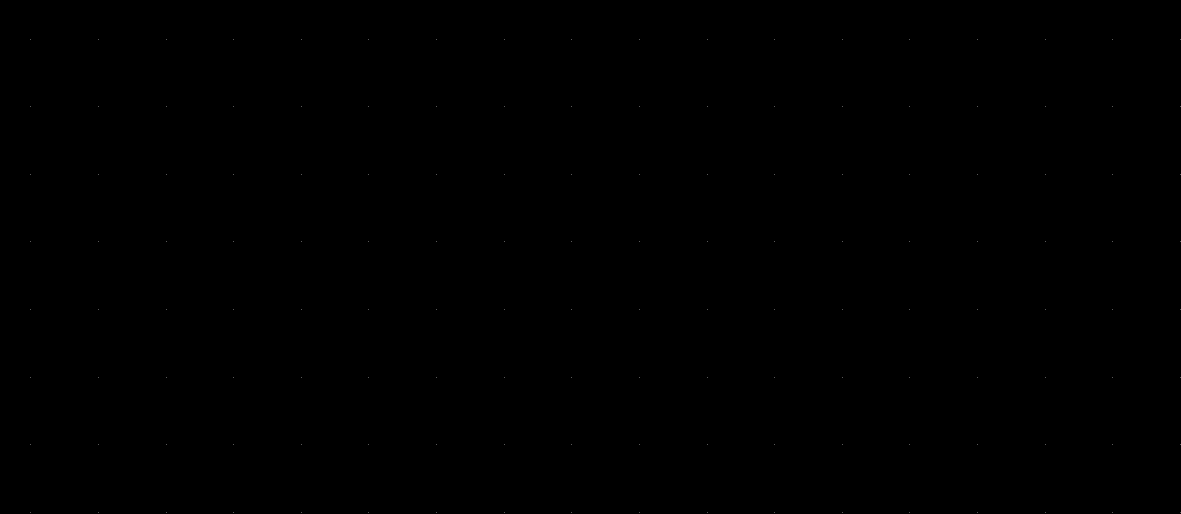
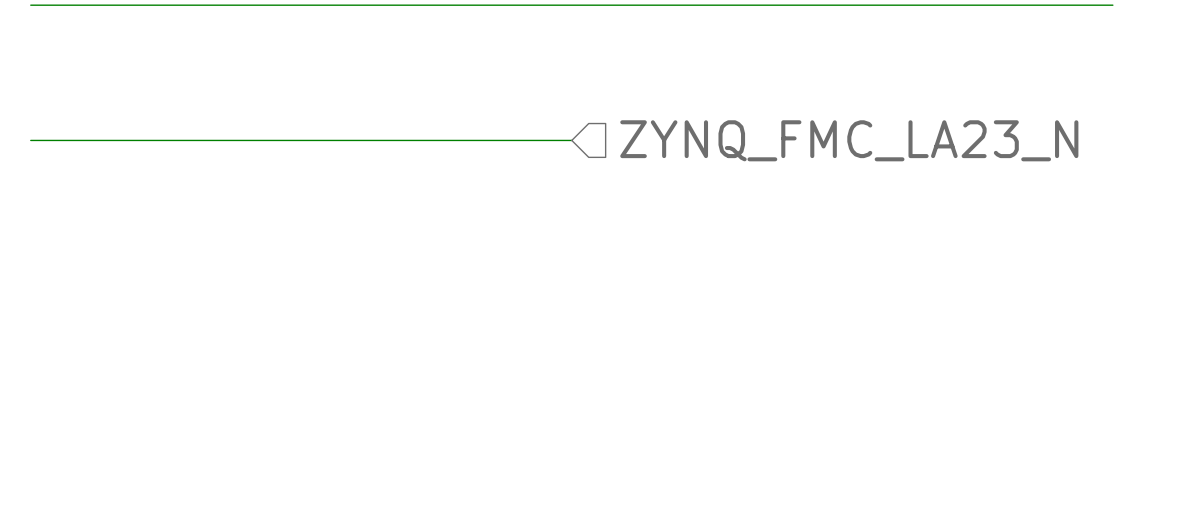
wire: none -> (30, 5) (1112, 5)
wire: none -> (30, 140) (571, 140)
hierarchical label: none -> ZYNQ_FMC_LA23_N (849, 140)

